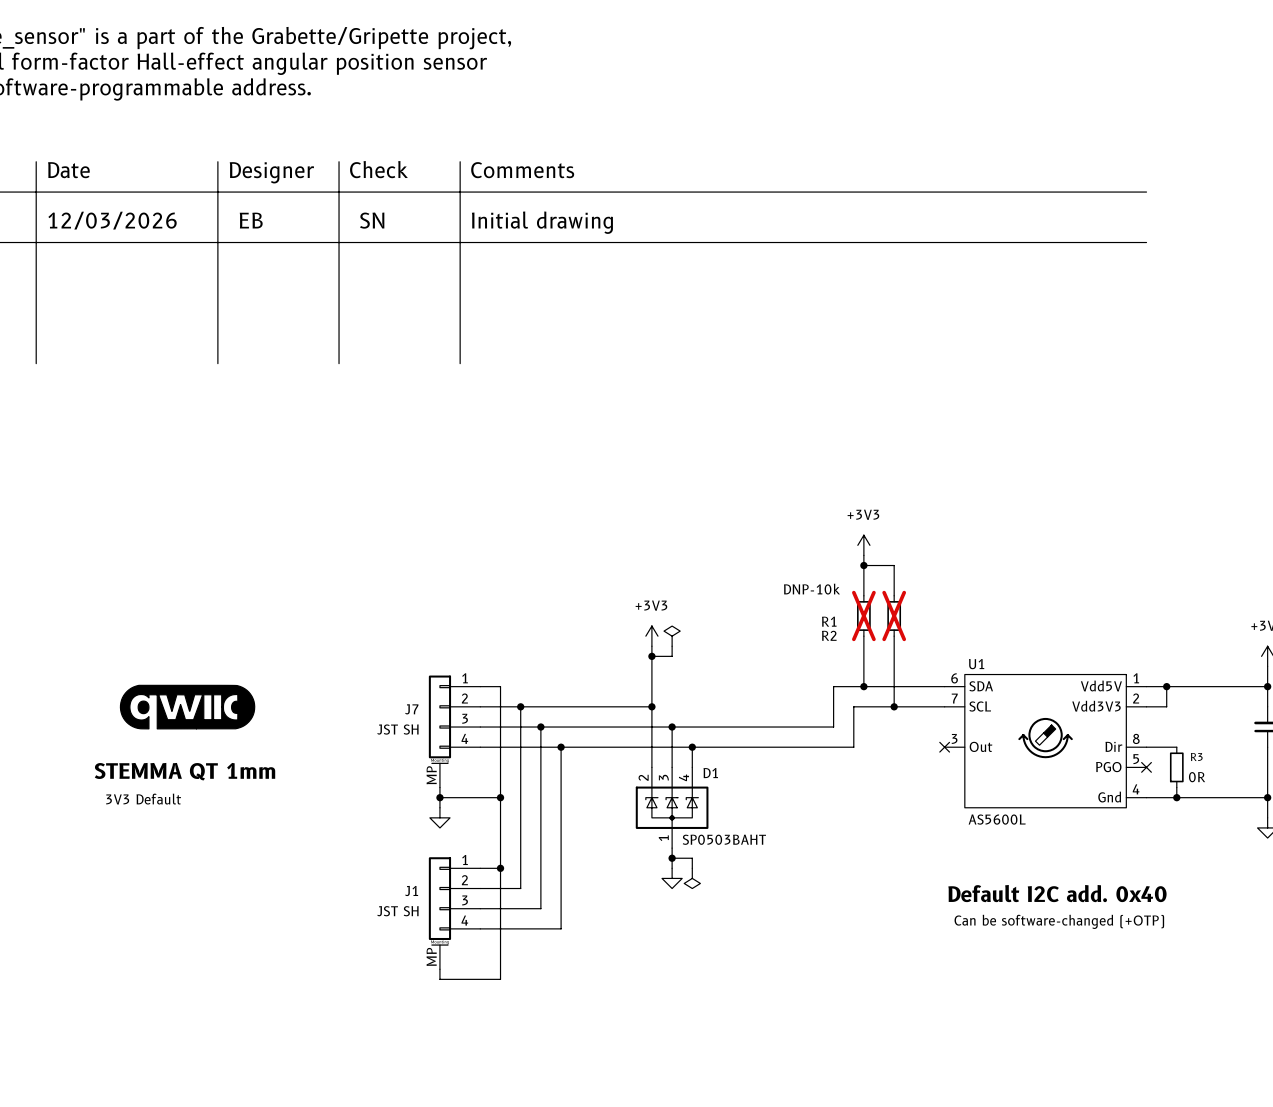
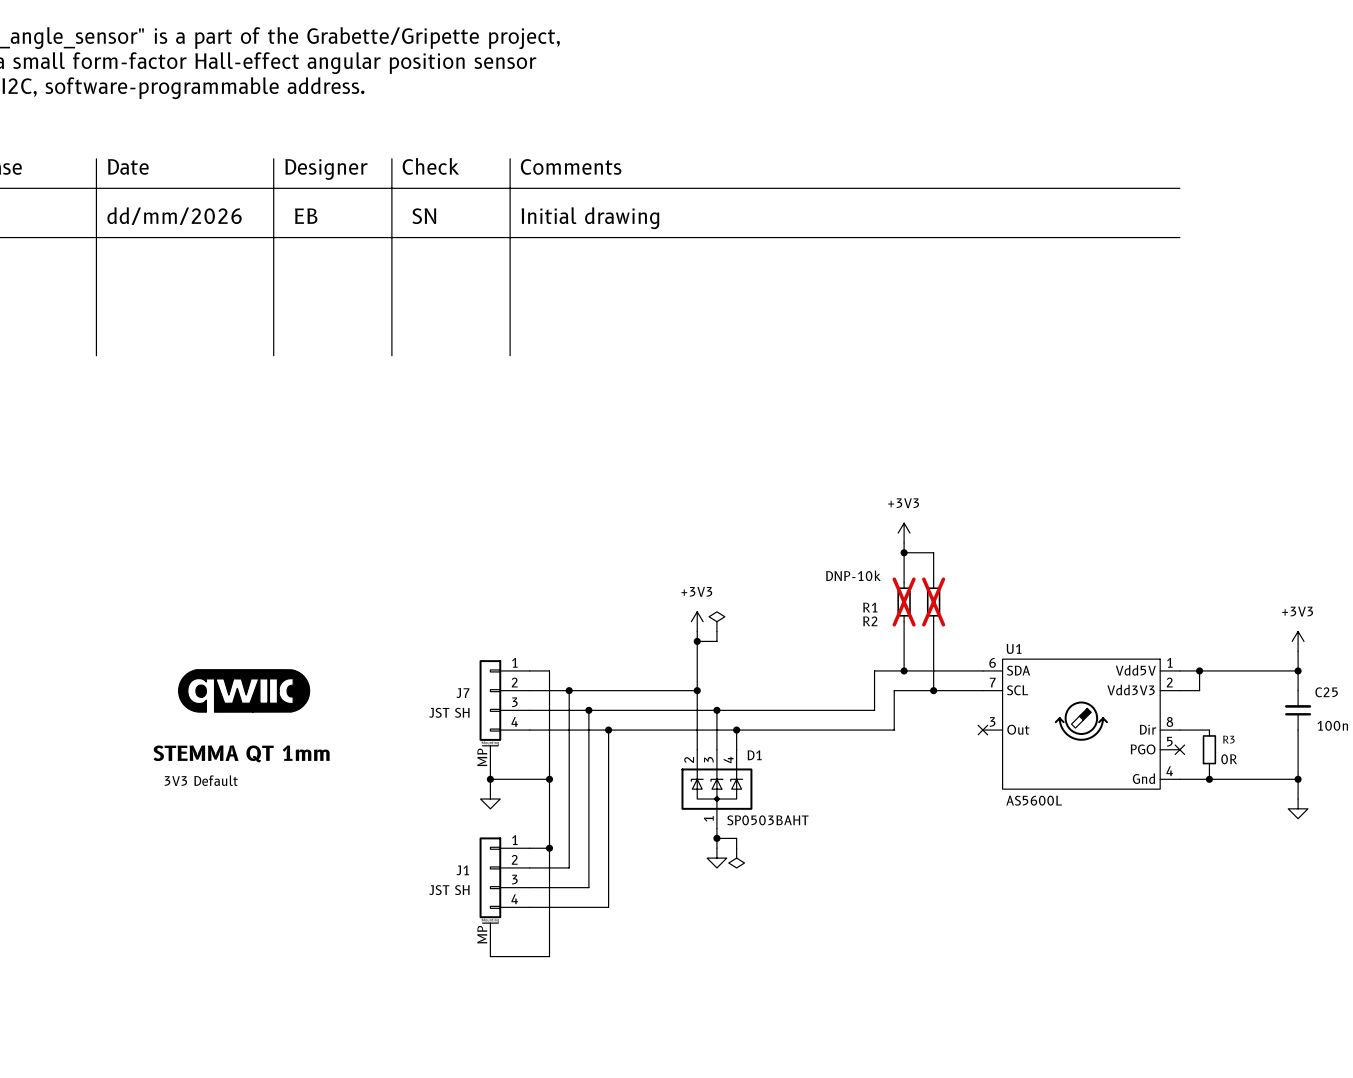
text: 12/03/2026 (112, 220) -> dd/mm/2026 (174, 216)
text: Default I2C add. 0x40 (1057, 893) -> none
text: Can be software-changed (+OTP) (1059, 921) -> none

